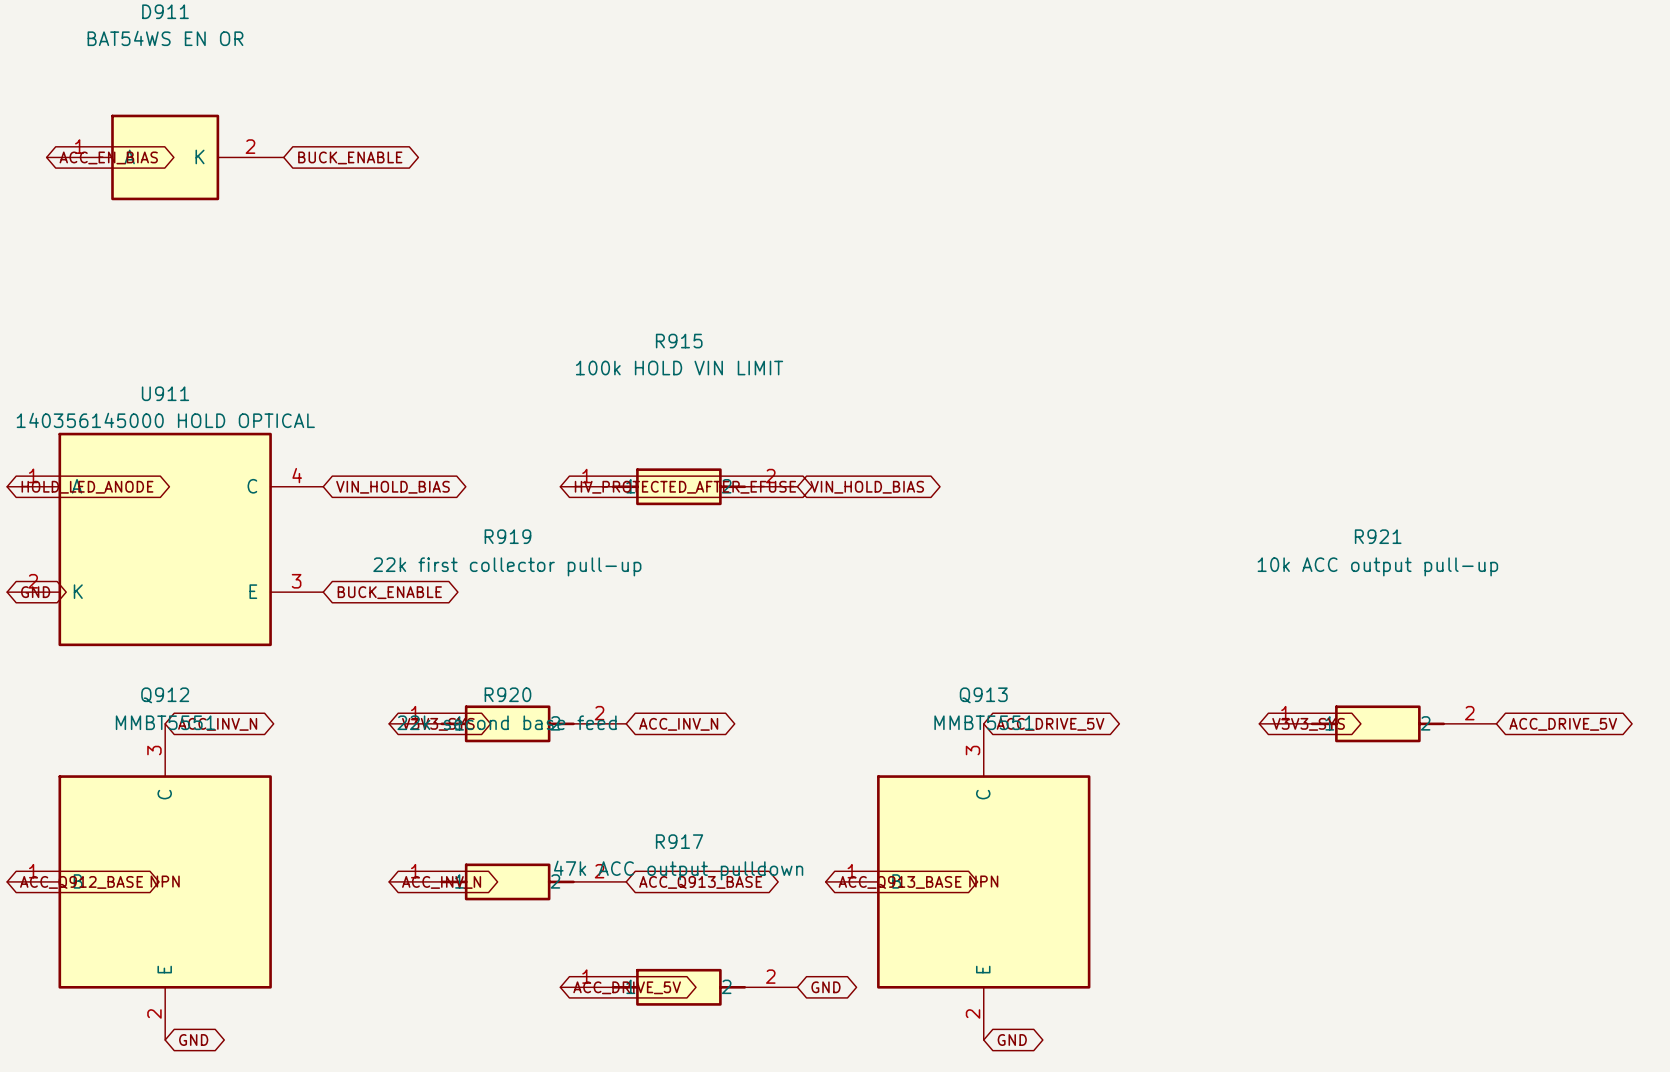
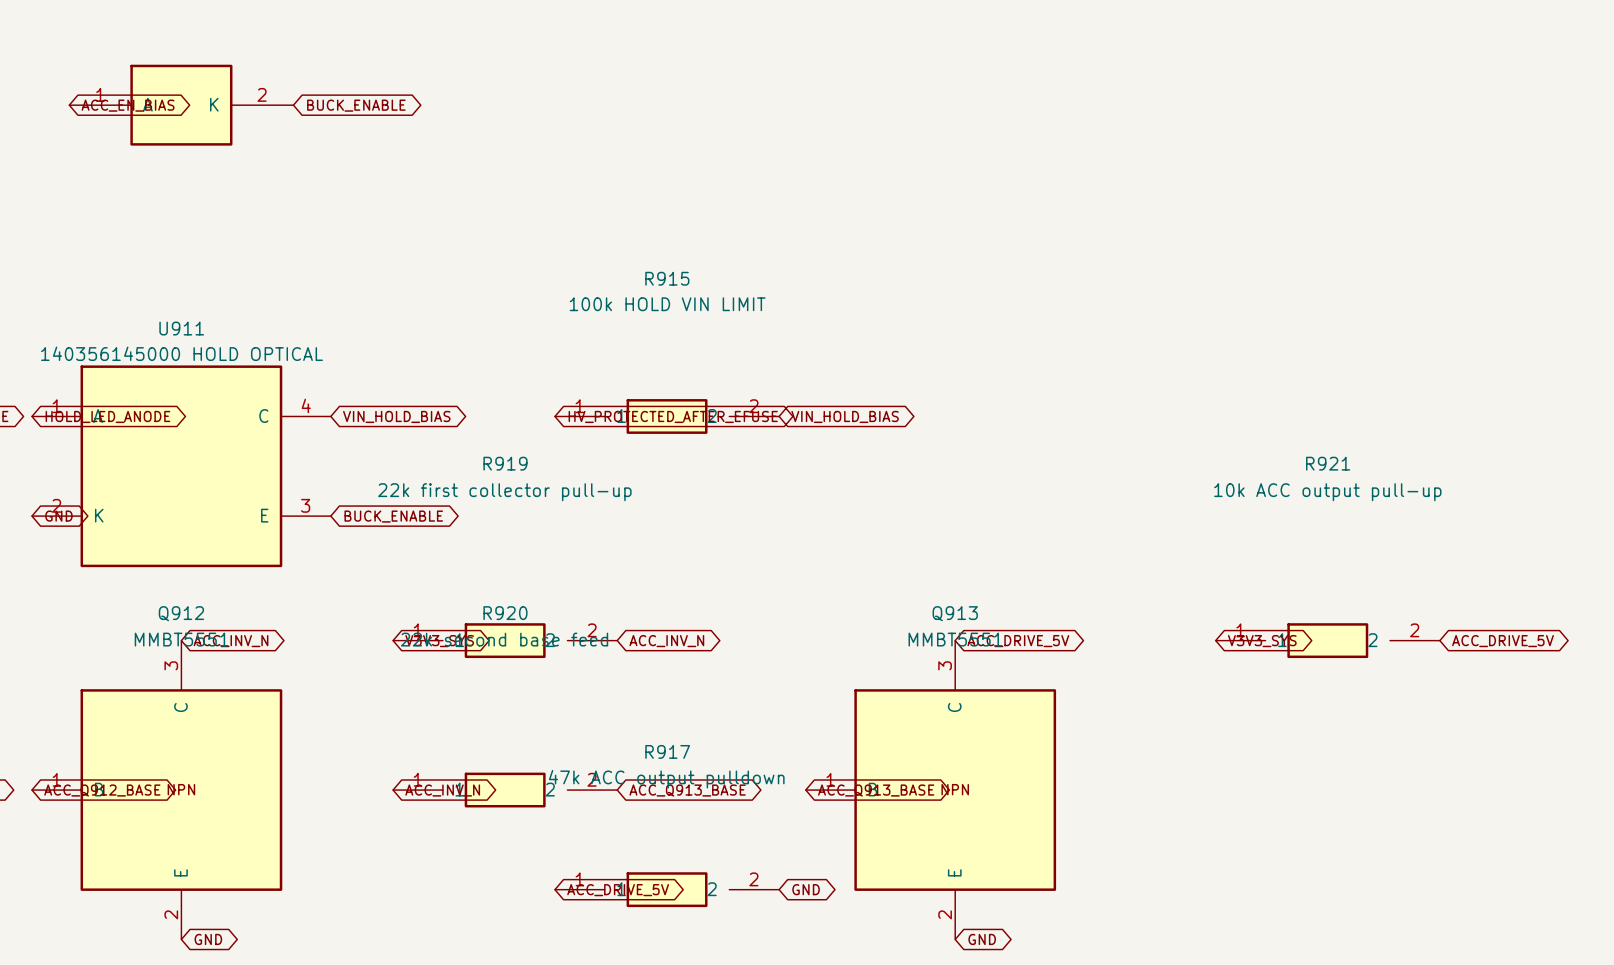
R915 symbol: [560, 468, 798, 506] -> [554, 399, 780, 434]
R919 symbol: [389, 705, 627, 743] -> [393, 623, 618, 659]
R921 symbol: [1259, 705, 1497, 743] -> [1215, 623, 1440, 659]
R920 symbol: [389, 863, 627, 901] -> [393, 772, 618, 808]
R917 symbol: [560, 968, 798, 1006] -> [554, 872, 780, 908]

